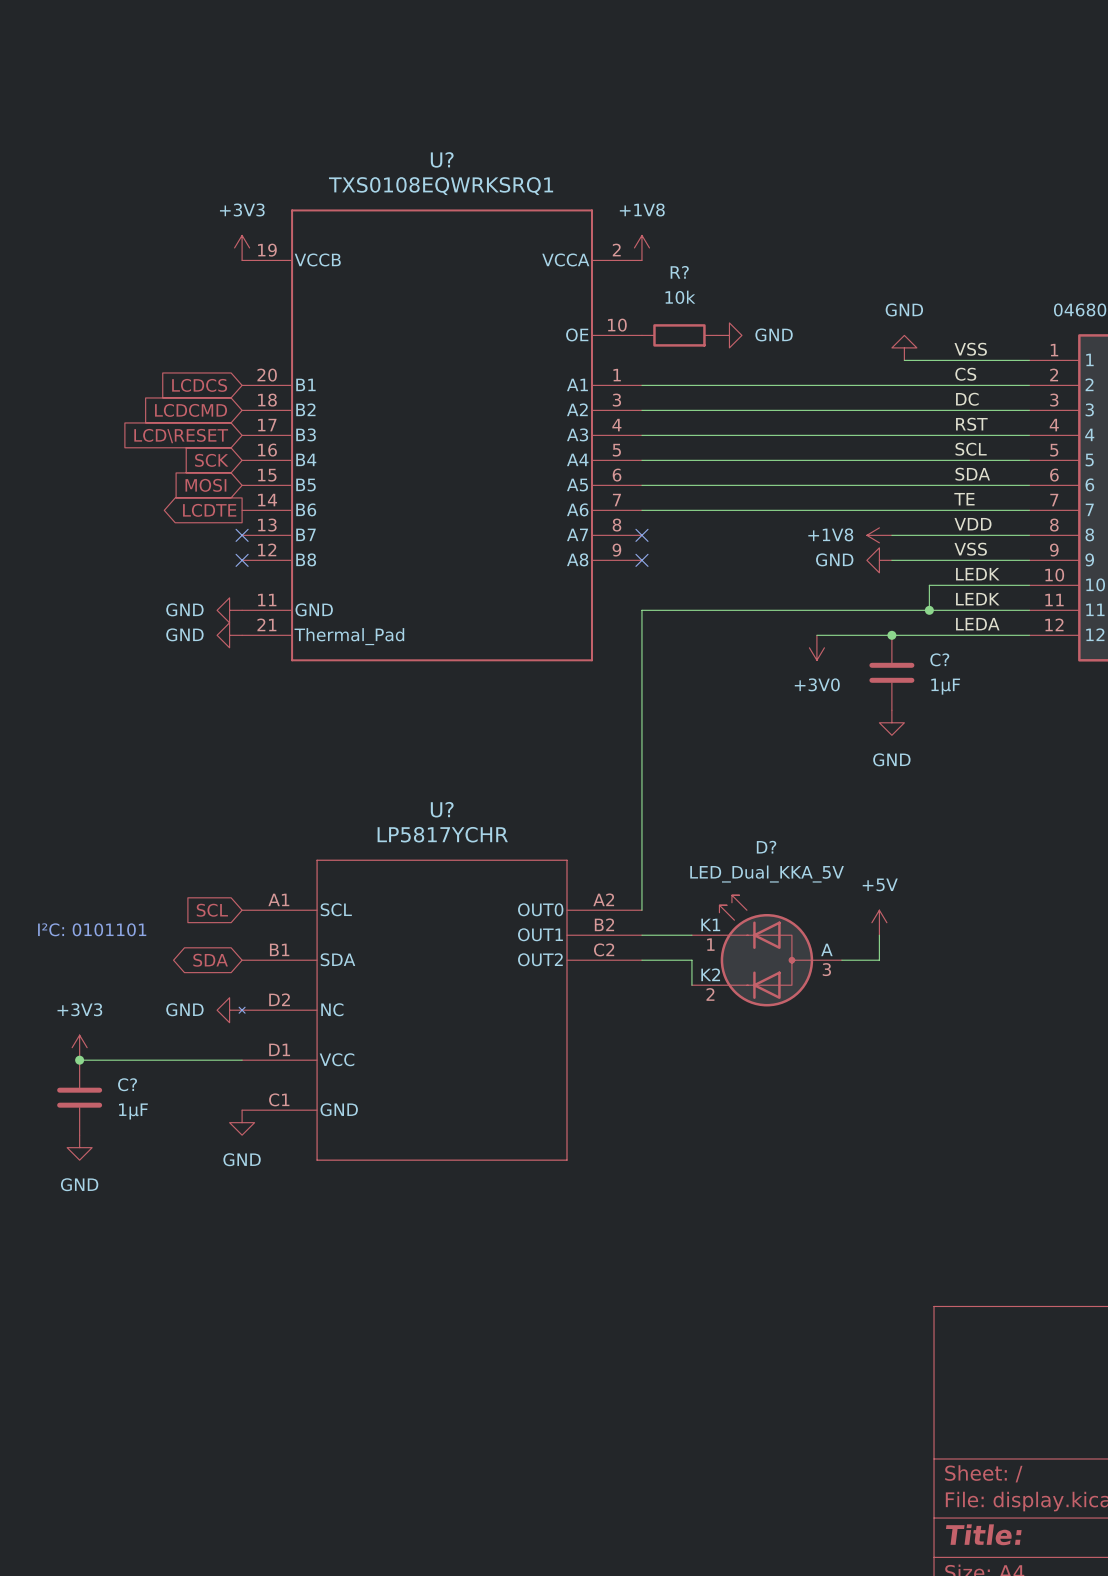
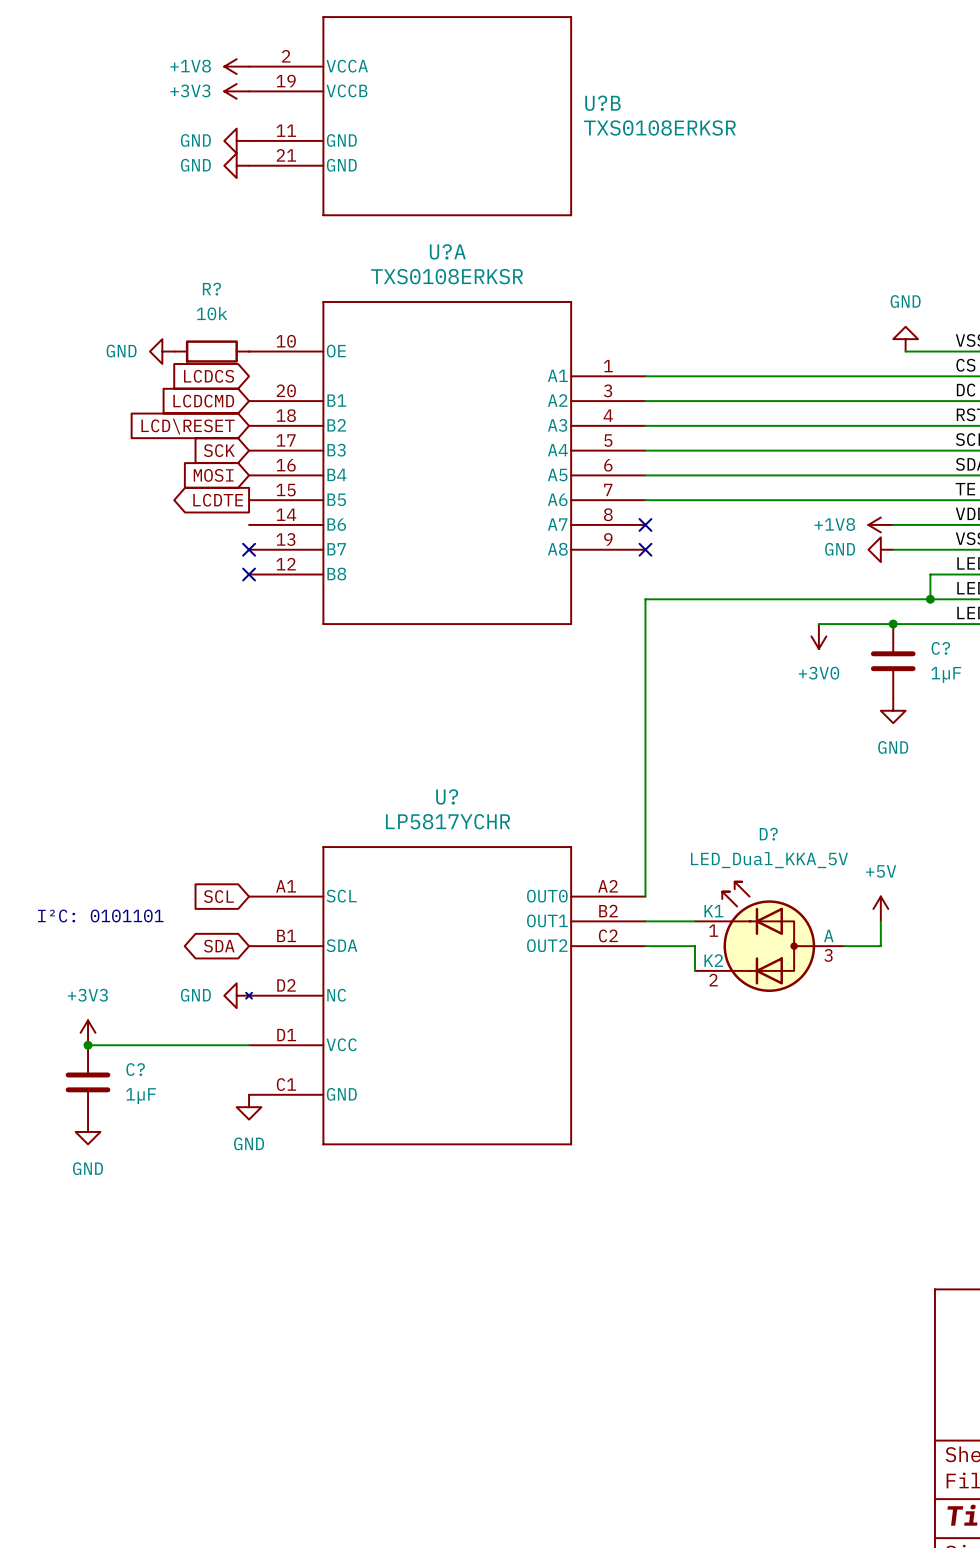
power symbol: none -> +1V8 (236, 66)
U?B: none -> TXS0108ERKSR (410, 116)
power symbol: none -> GND (236, 140)
power symbol: none -> GND (236, 165)
power symbol rotation: 0° (242, 247) -> 90° counterclockwise (236, 91)
power symbol position: +3V3 (242, 247) -> +3V3 (236, 91)
power symbol: +1V8 (641, 247) -> none
R?: 10k (679, 335) -> none
power symbol: GND (729, 335) -> none
power symbol: none -> GND (162, 351)
R?: none -> 10k (211, 351)
U?: TXS0108EQWRKSRQ1 (442, 435) -> none
U?A: none -> TXS0108ERKSR (447, 463)
no-connect mark position: (242, 535) -> (249, 574)
power symbol: GND (229, 610) -> none
power symbol: GND (229, 635) -> none

